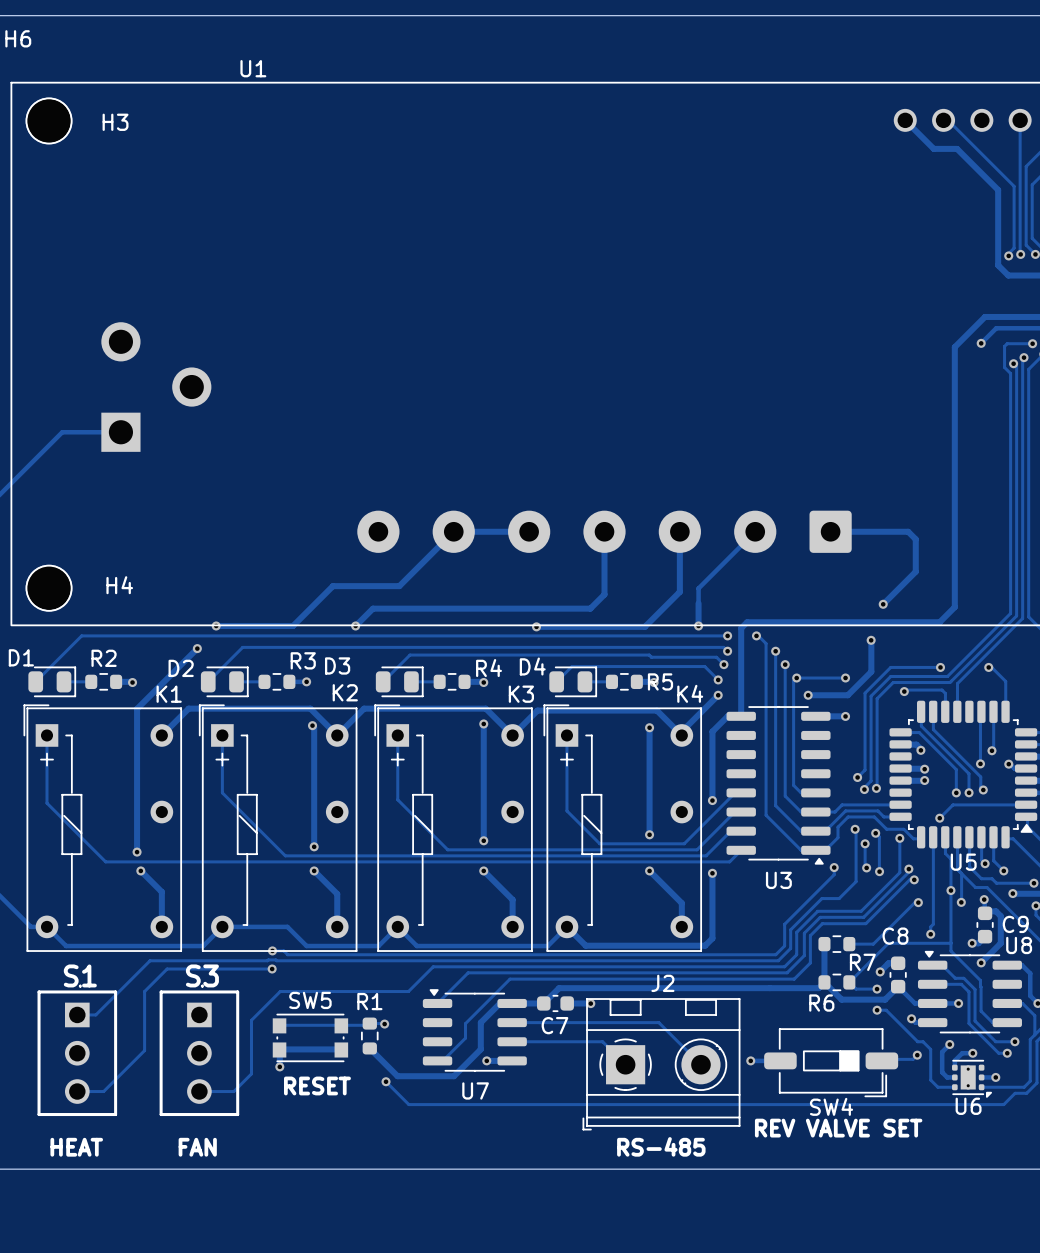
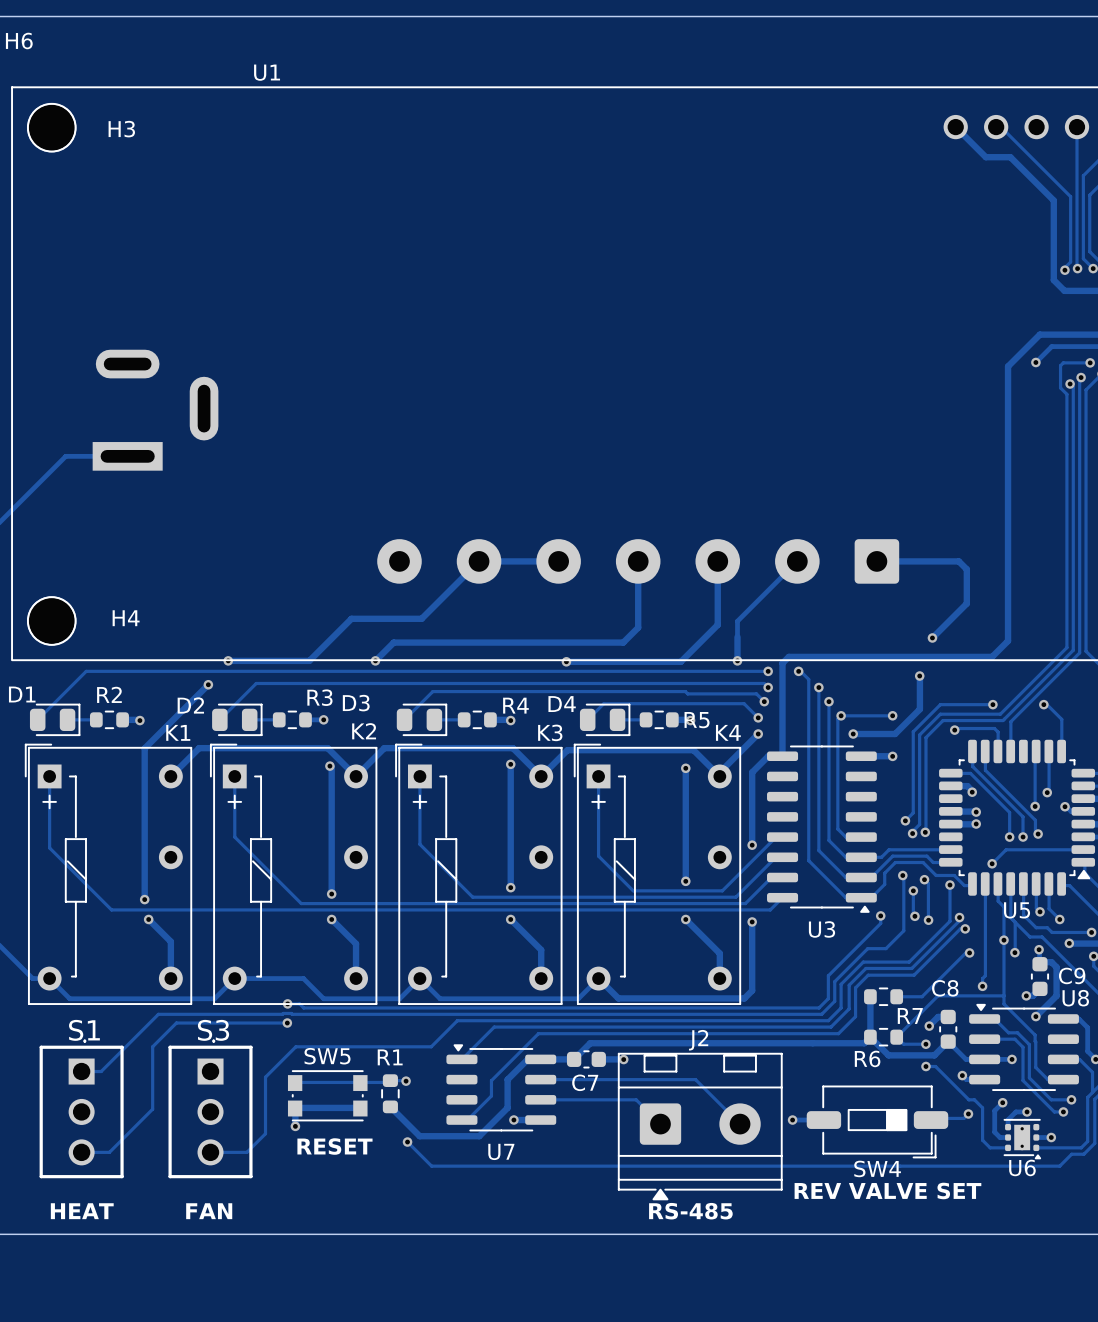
part footprint: [101, 322, 212, 452] -> [92, 349, 219, 471]
J2 footprint: [582, 998, 741, 1131] -> [617, 1052, 783, 1201]
U6 footprint: [952, 1059, 993, 1098] -> [1003, 1118, 1042, 1160]

